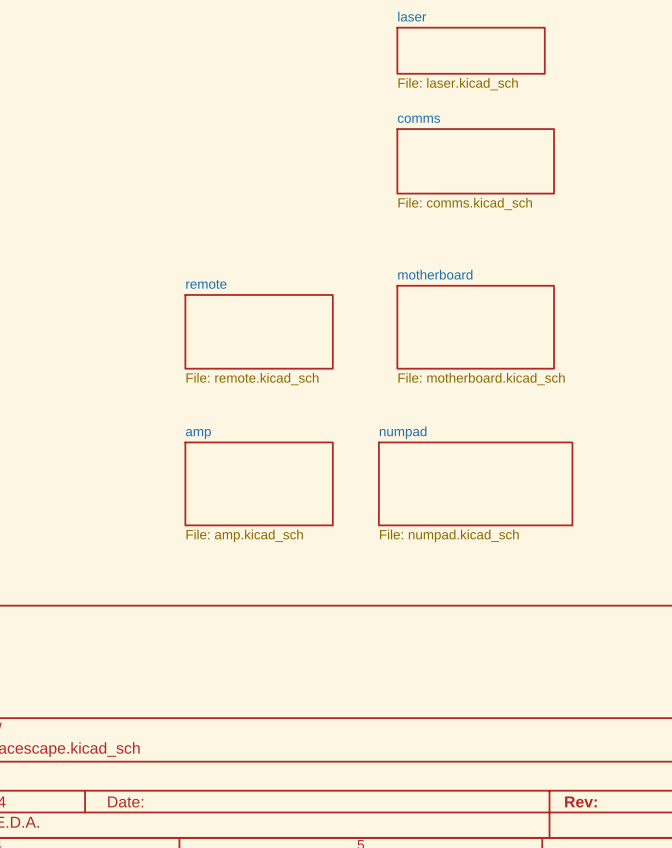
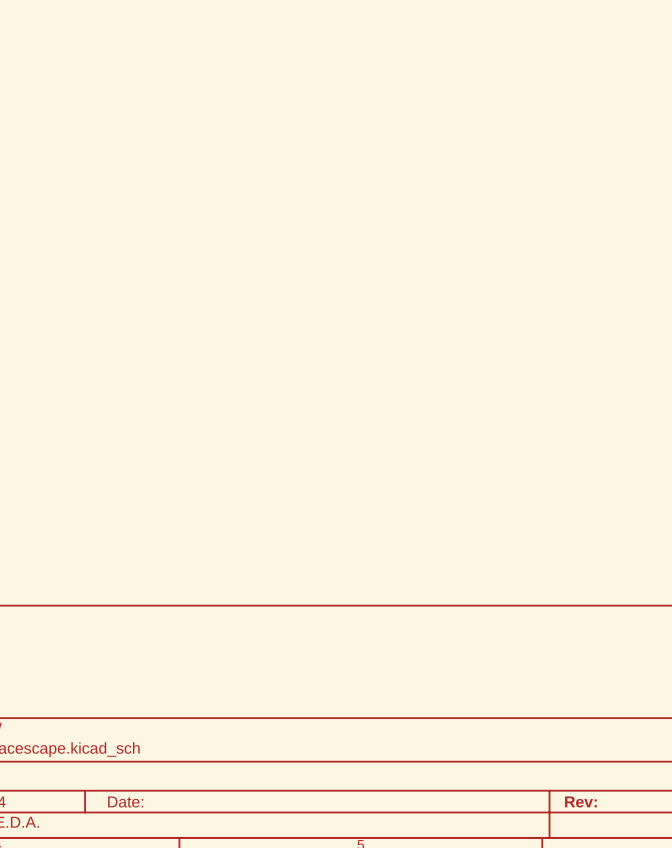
sheet laser: File: laser.kicad_sch (471, 50) -> none
sheet comms: File: comms.kicad_sch (475, 161) -> none
sheet motherboard: File: motherboard.kicad_sch (475, 327) -> none
sheet remote: File: remote.kicad_sch (259, 331) -> none
sheet amp: File: amp.kicad_sch (259, 483) -> none
sheet numpad: File: numpad.kicad_sch (475, 483) -> none

